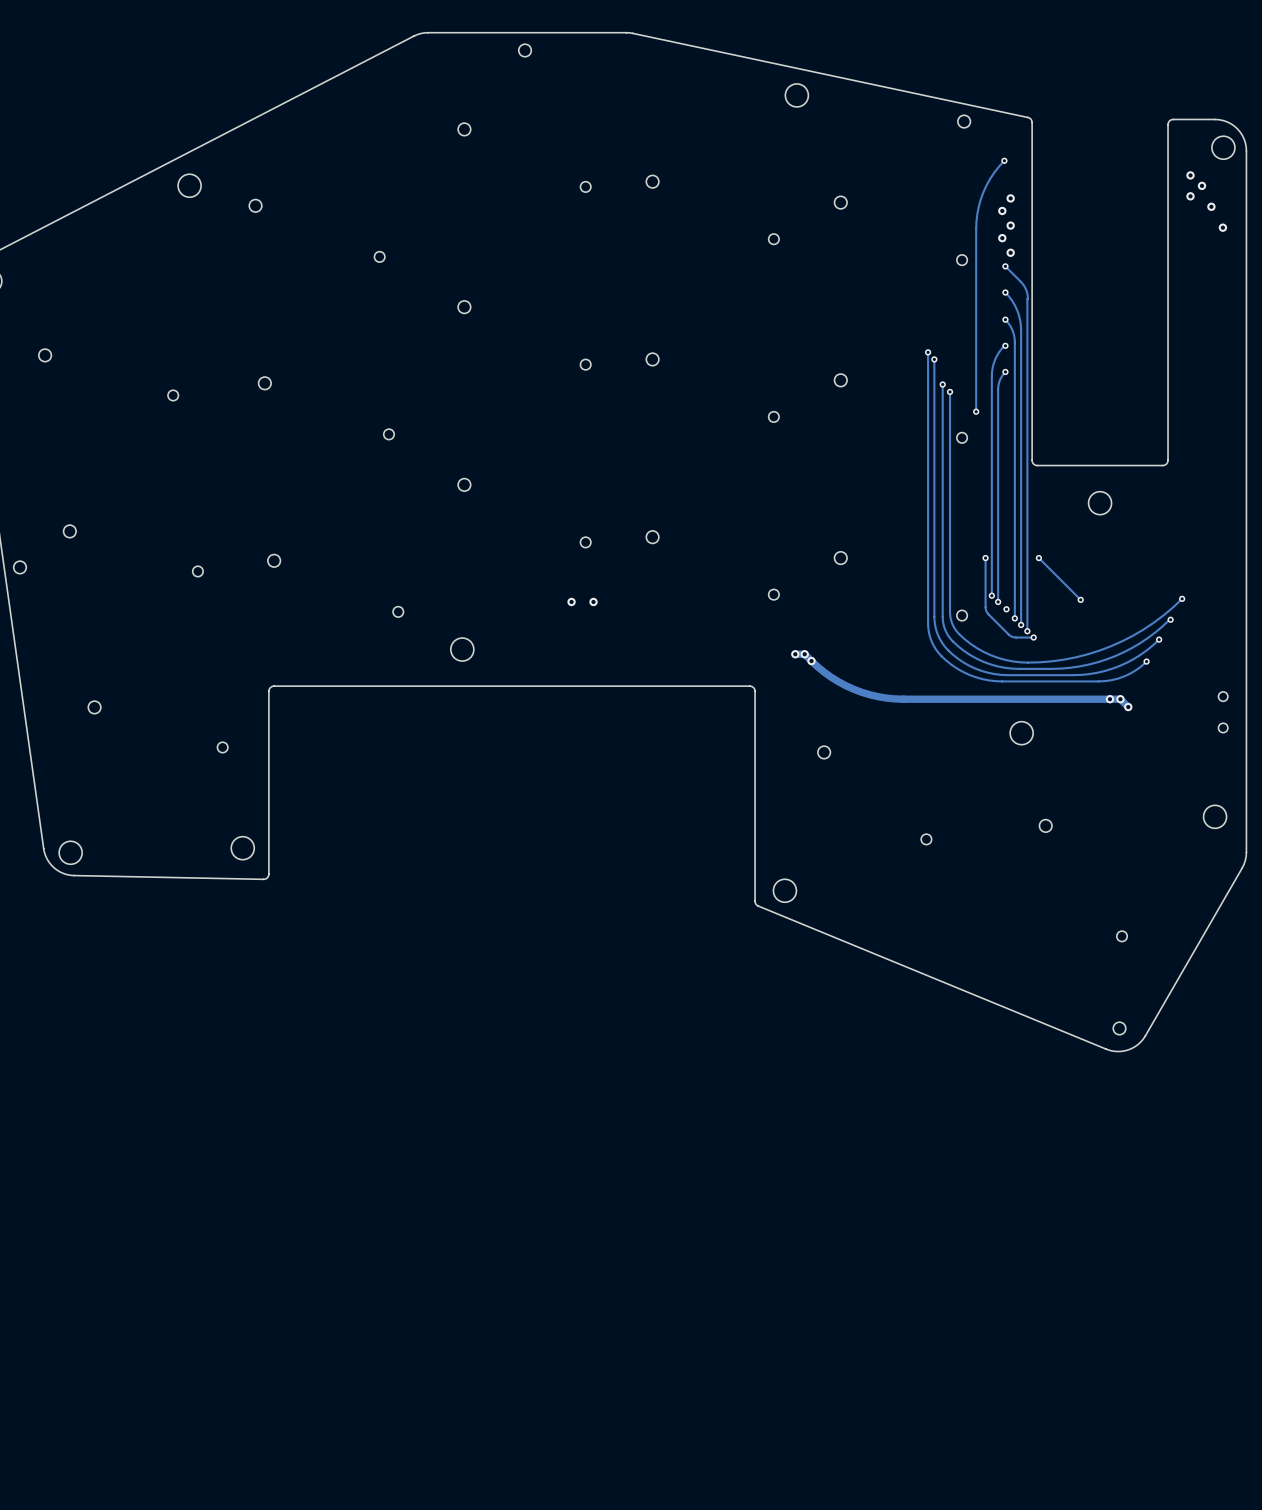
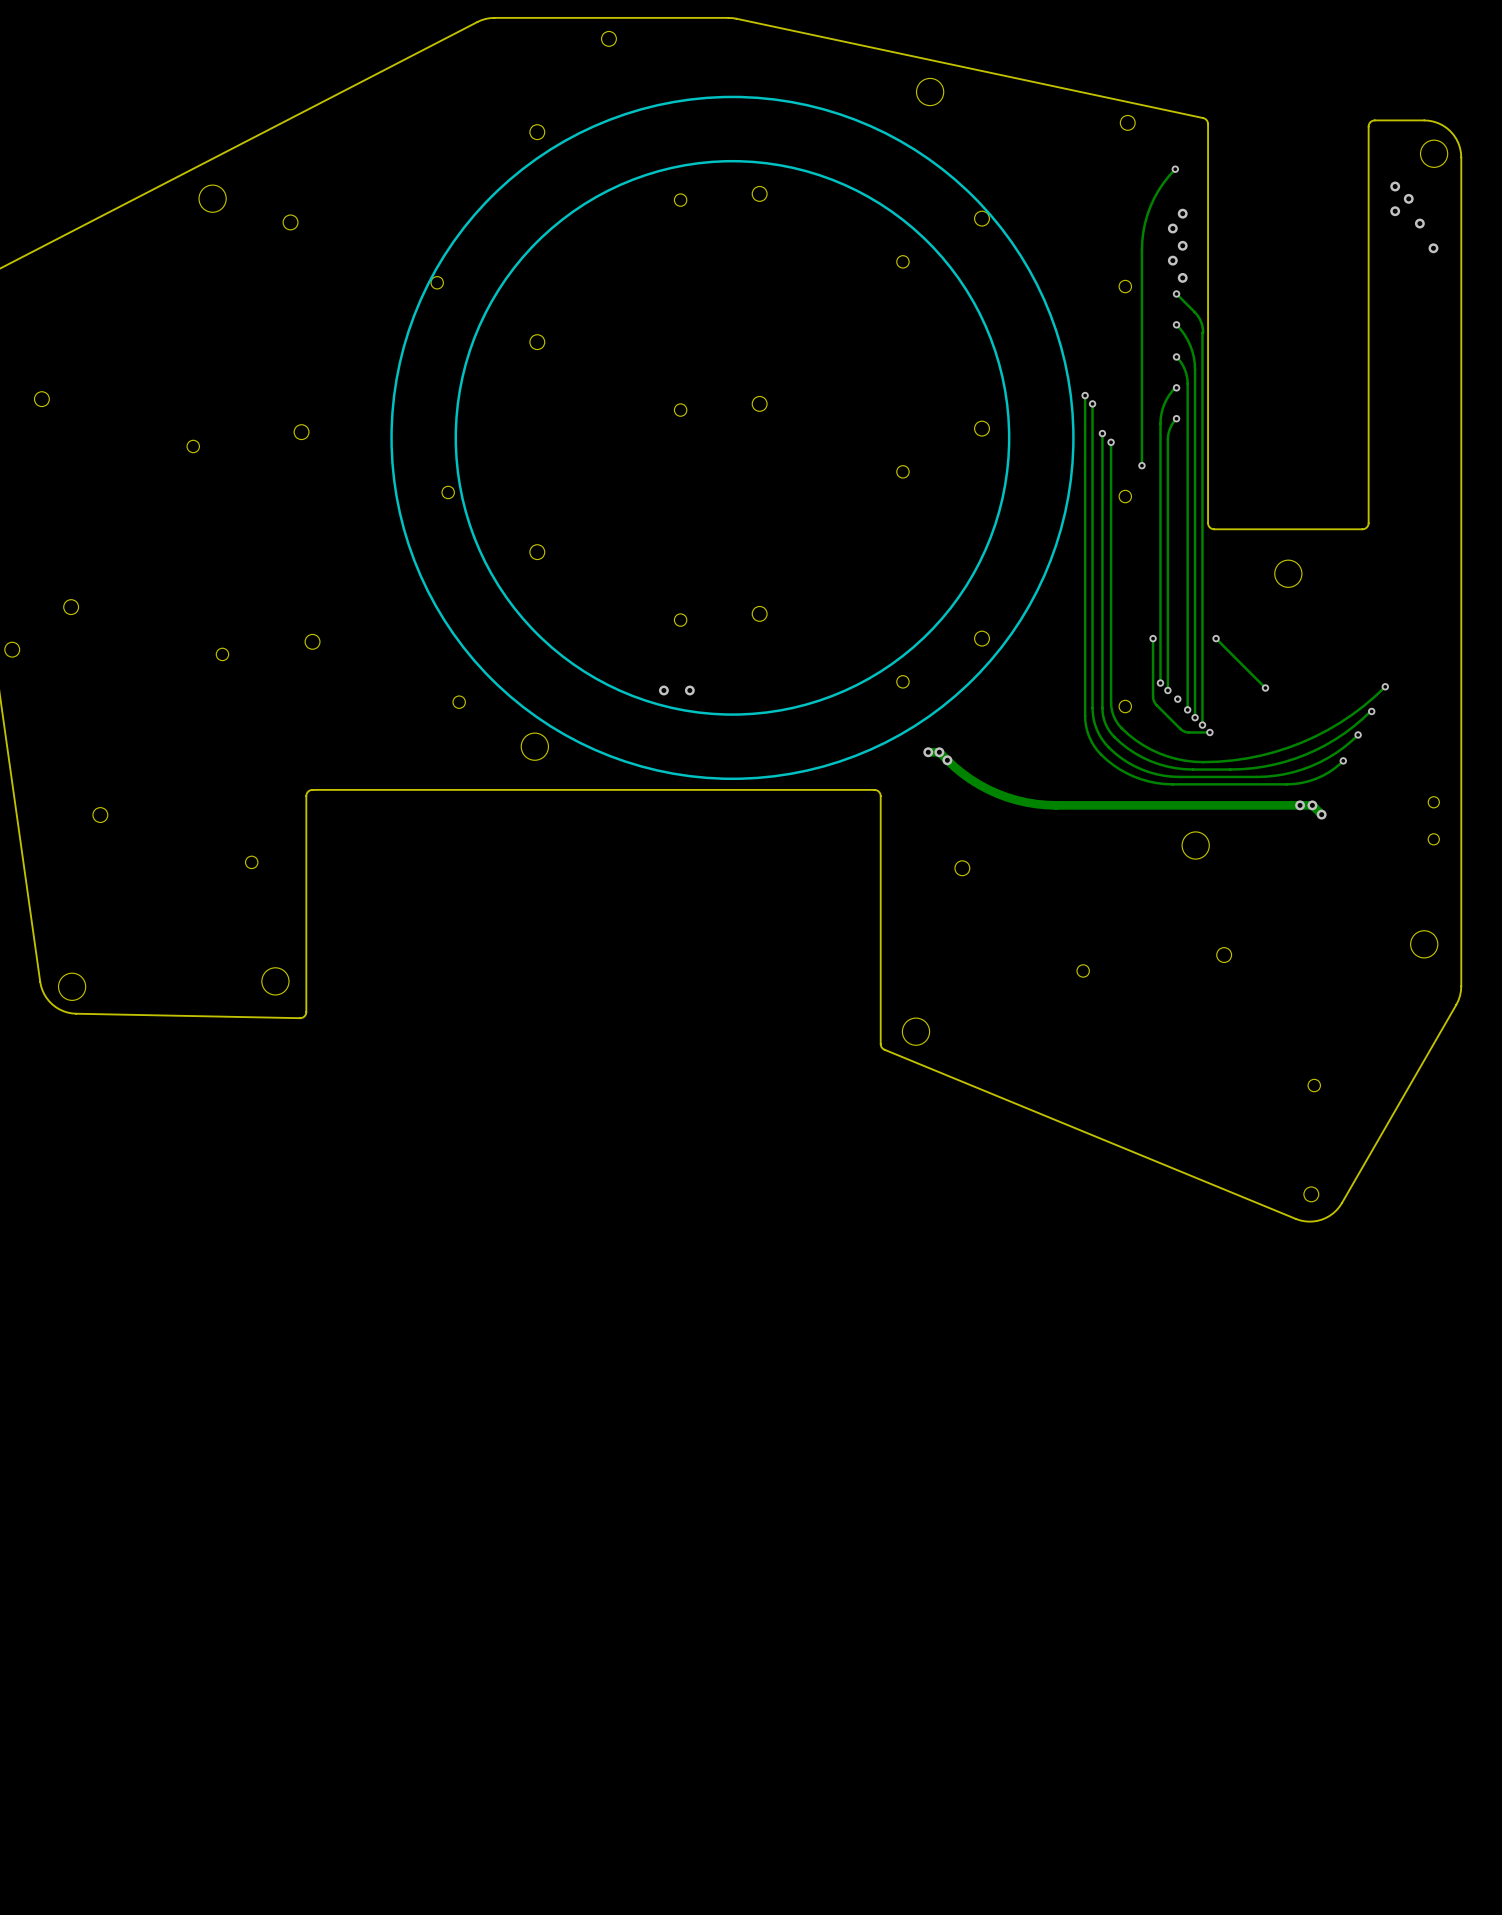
drawing: none -> [390, 95, 1075, 781]

